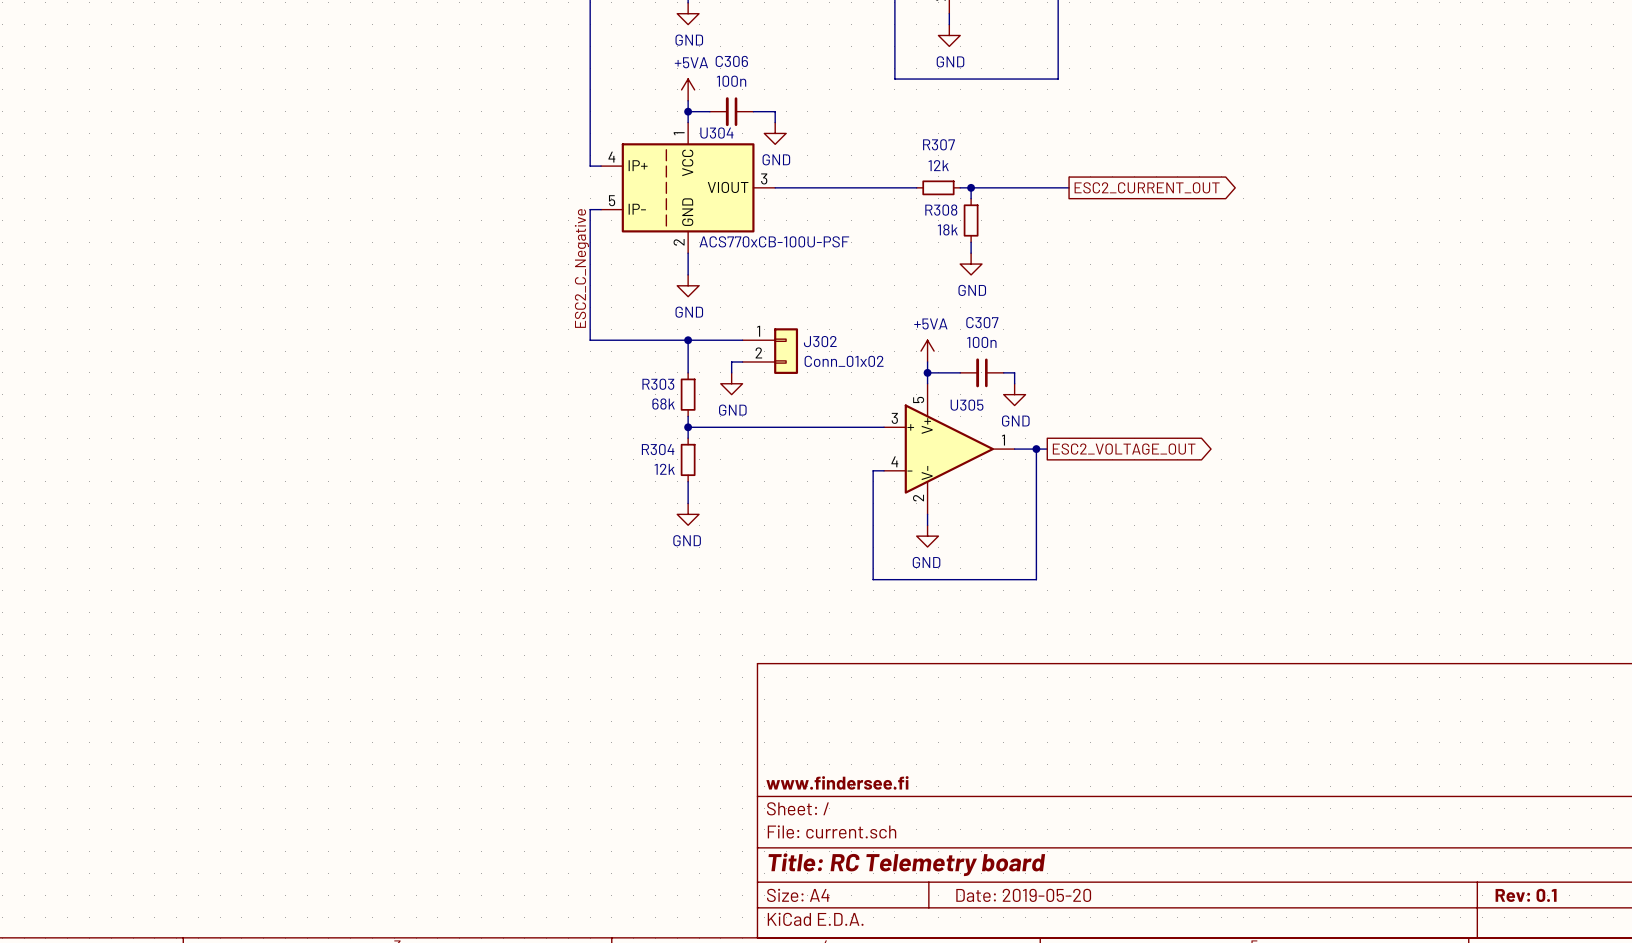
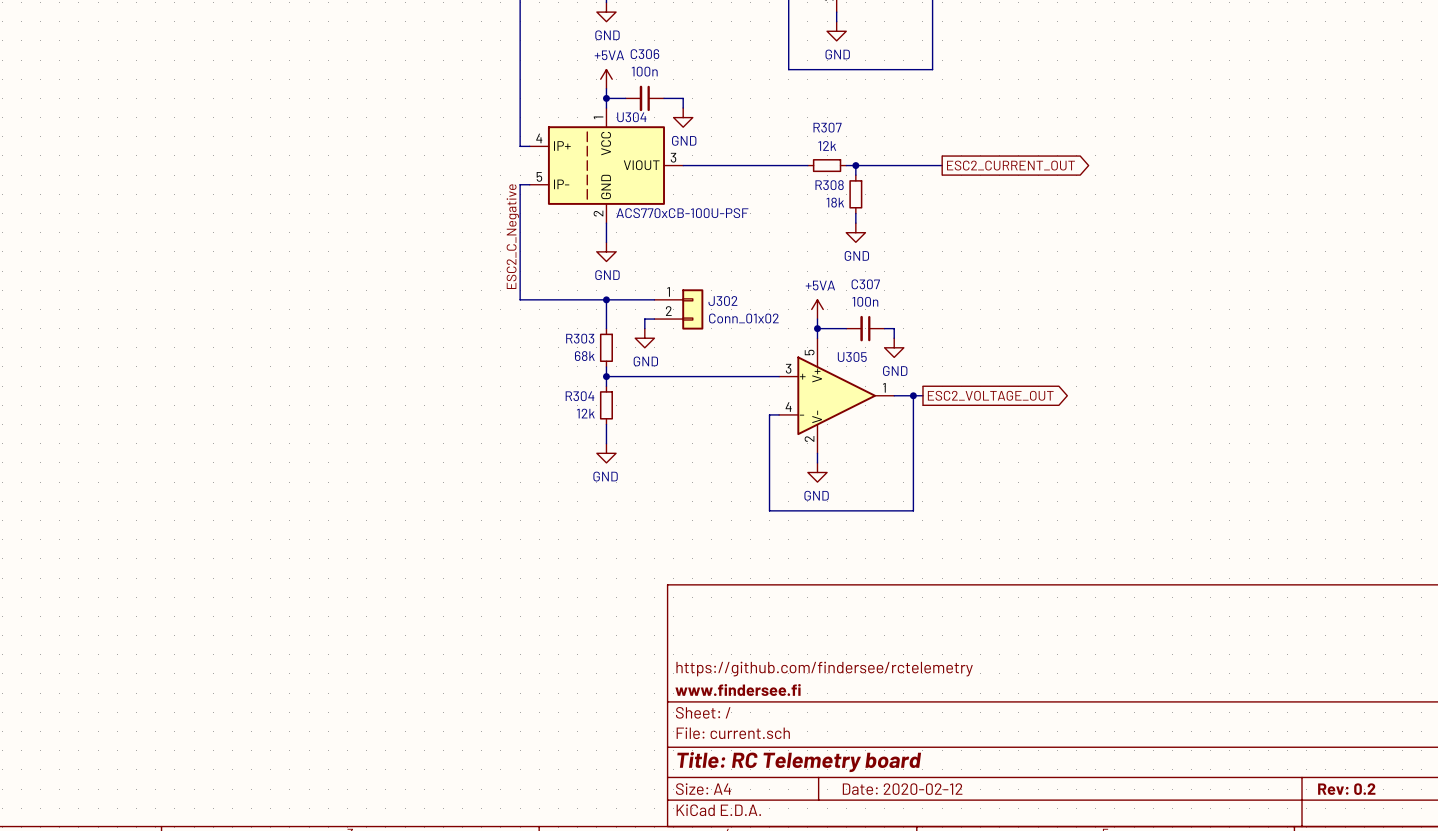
title block: none -> https://github.com/findersee/rctelemetry (824, 669)
title block: Date: 2019-05-20 (1023, 895) -> Date: 2020-02-12 (902, 789)
title block: Rev: 0.1 (1526, 895) -> Rev: 0.2 (1346, 789)

